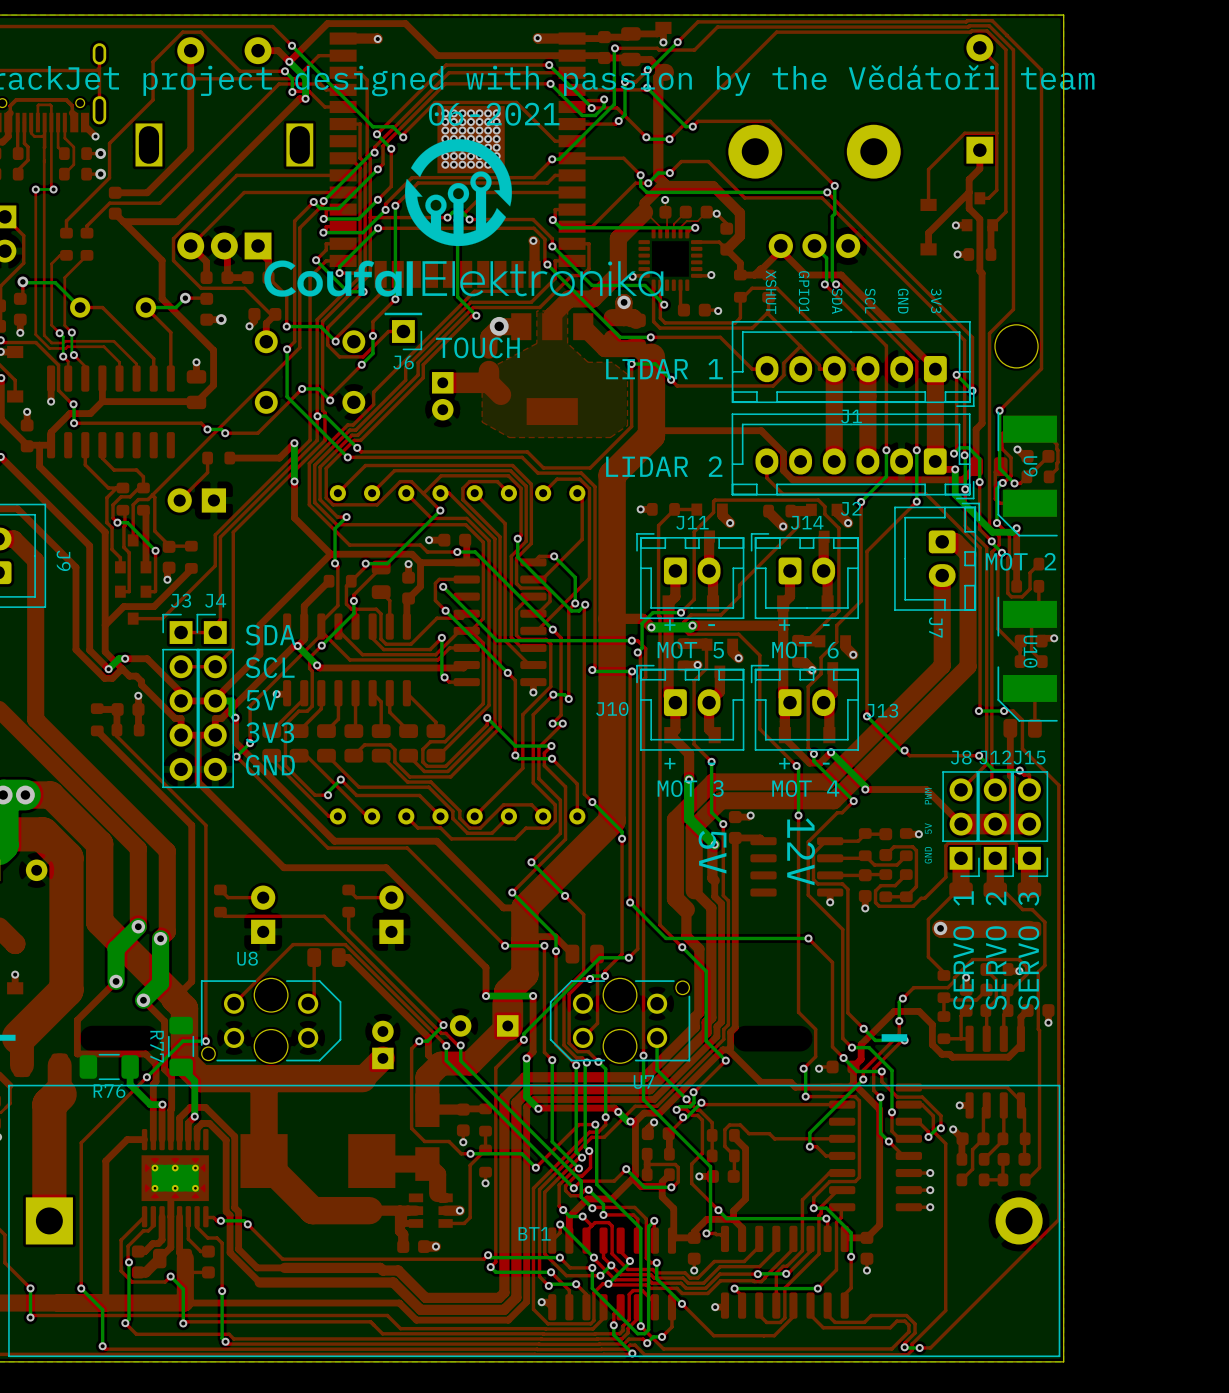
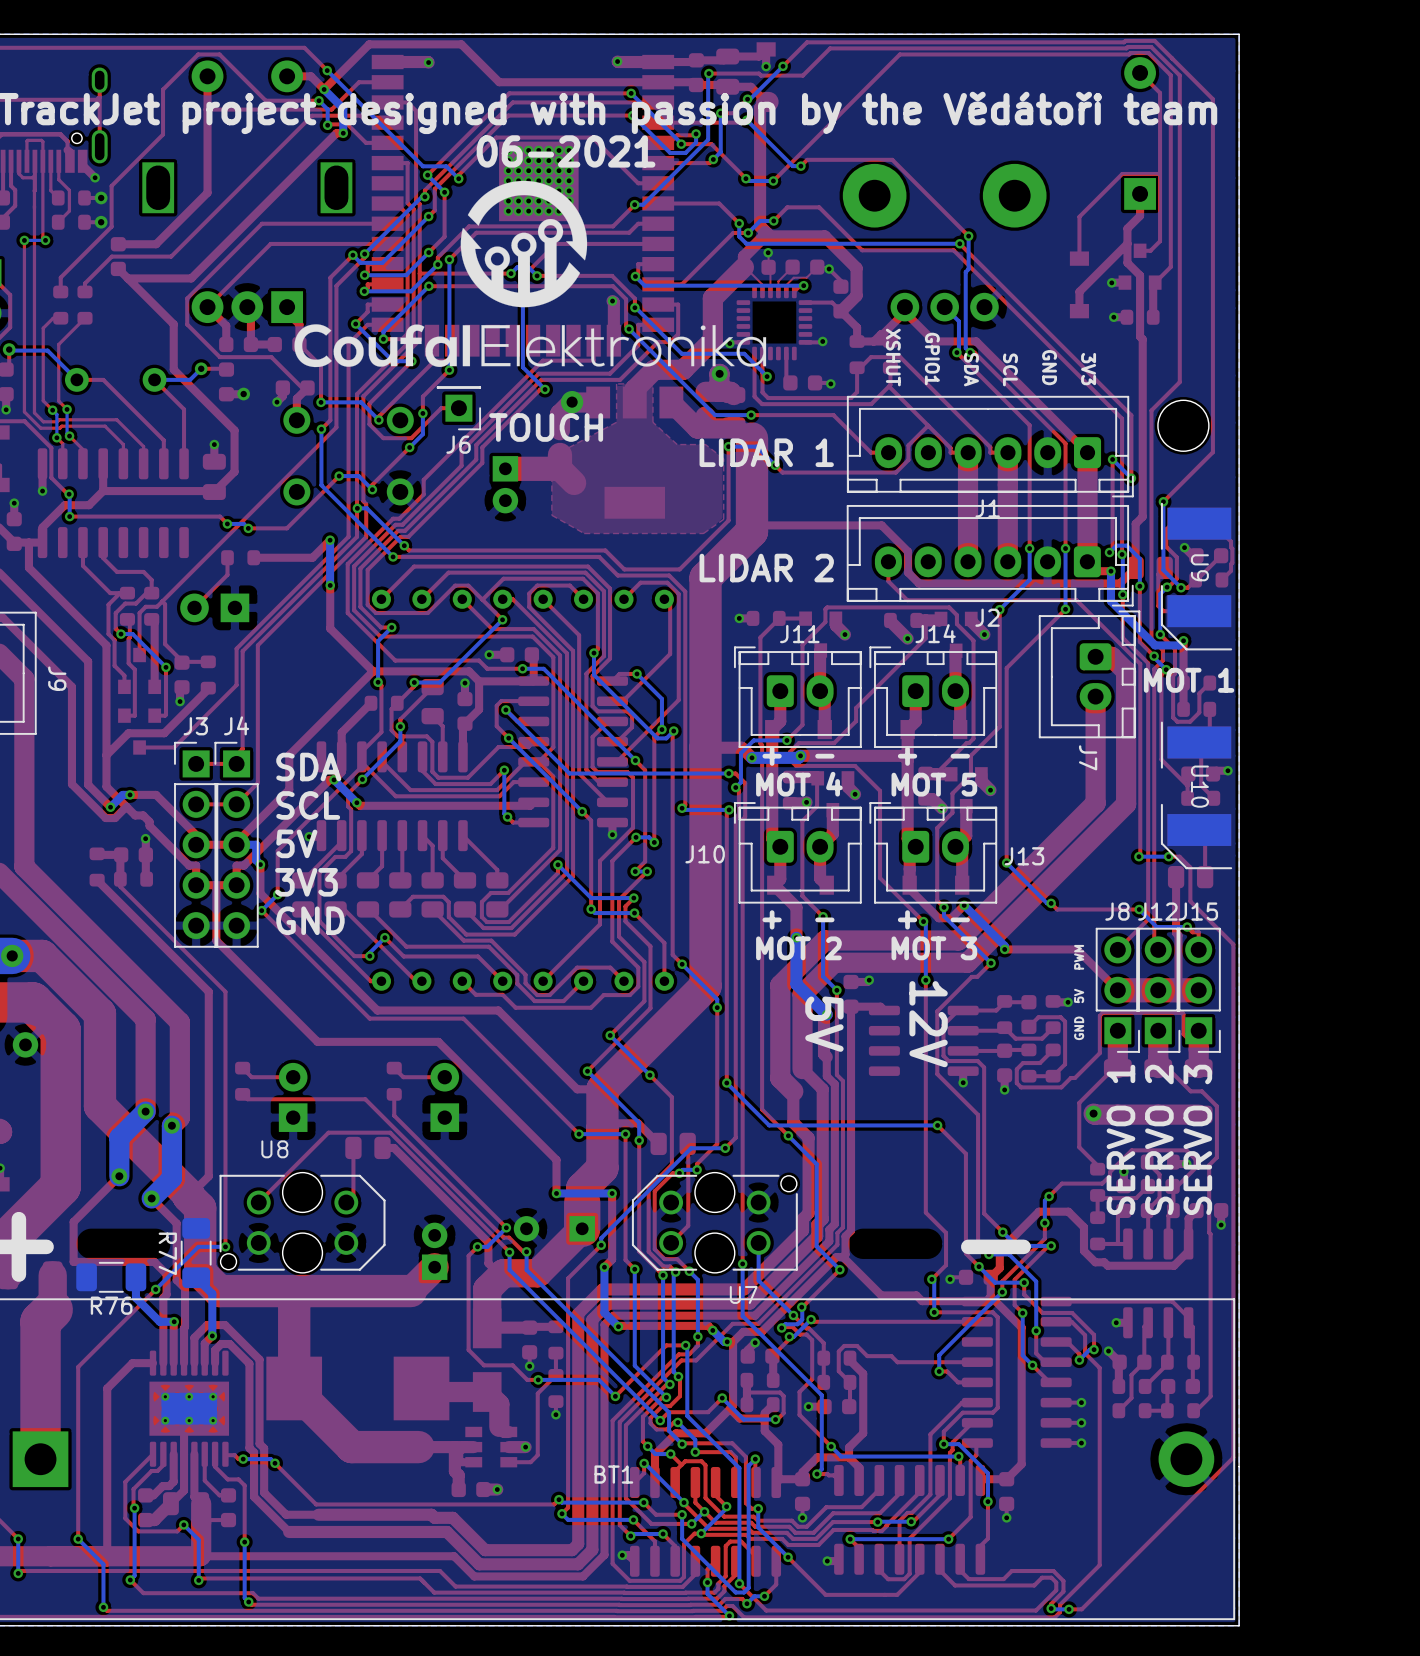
text: MOT 2 (1020, 561) -> MOT 1 (1189, 680)
text: MOT 5 (690, 650) -> MOT 4 (799, 784)
text: MOT 6 (805, 650) -> MOT 5 (934, 784)
text: MOT 3 (690, 788) -> MOT 2 (798, 948)
text: MOT 4 (805, 788) -> MOT 3 (934, 948)

